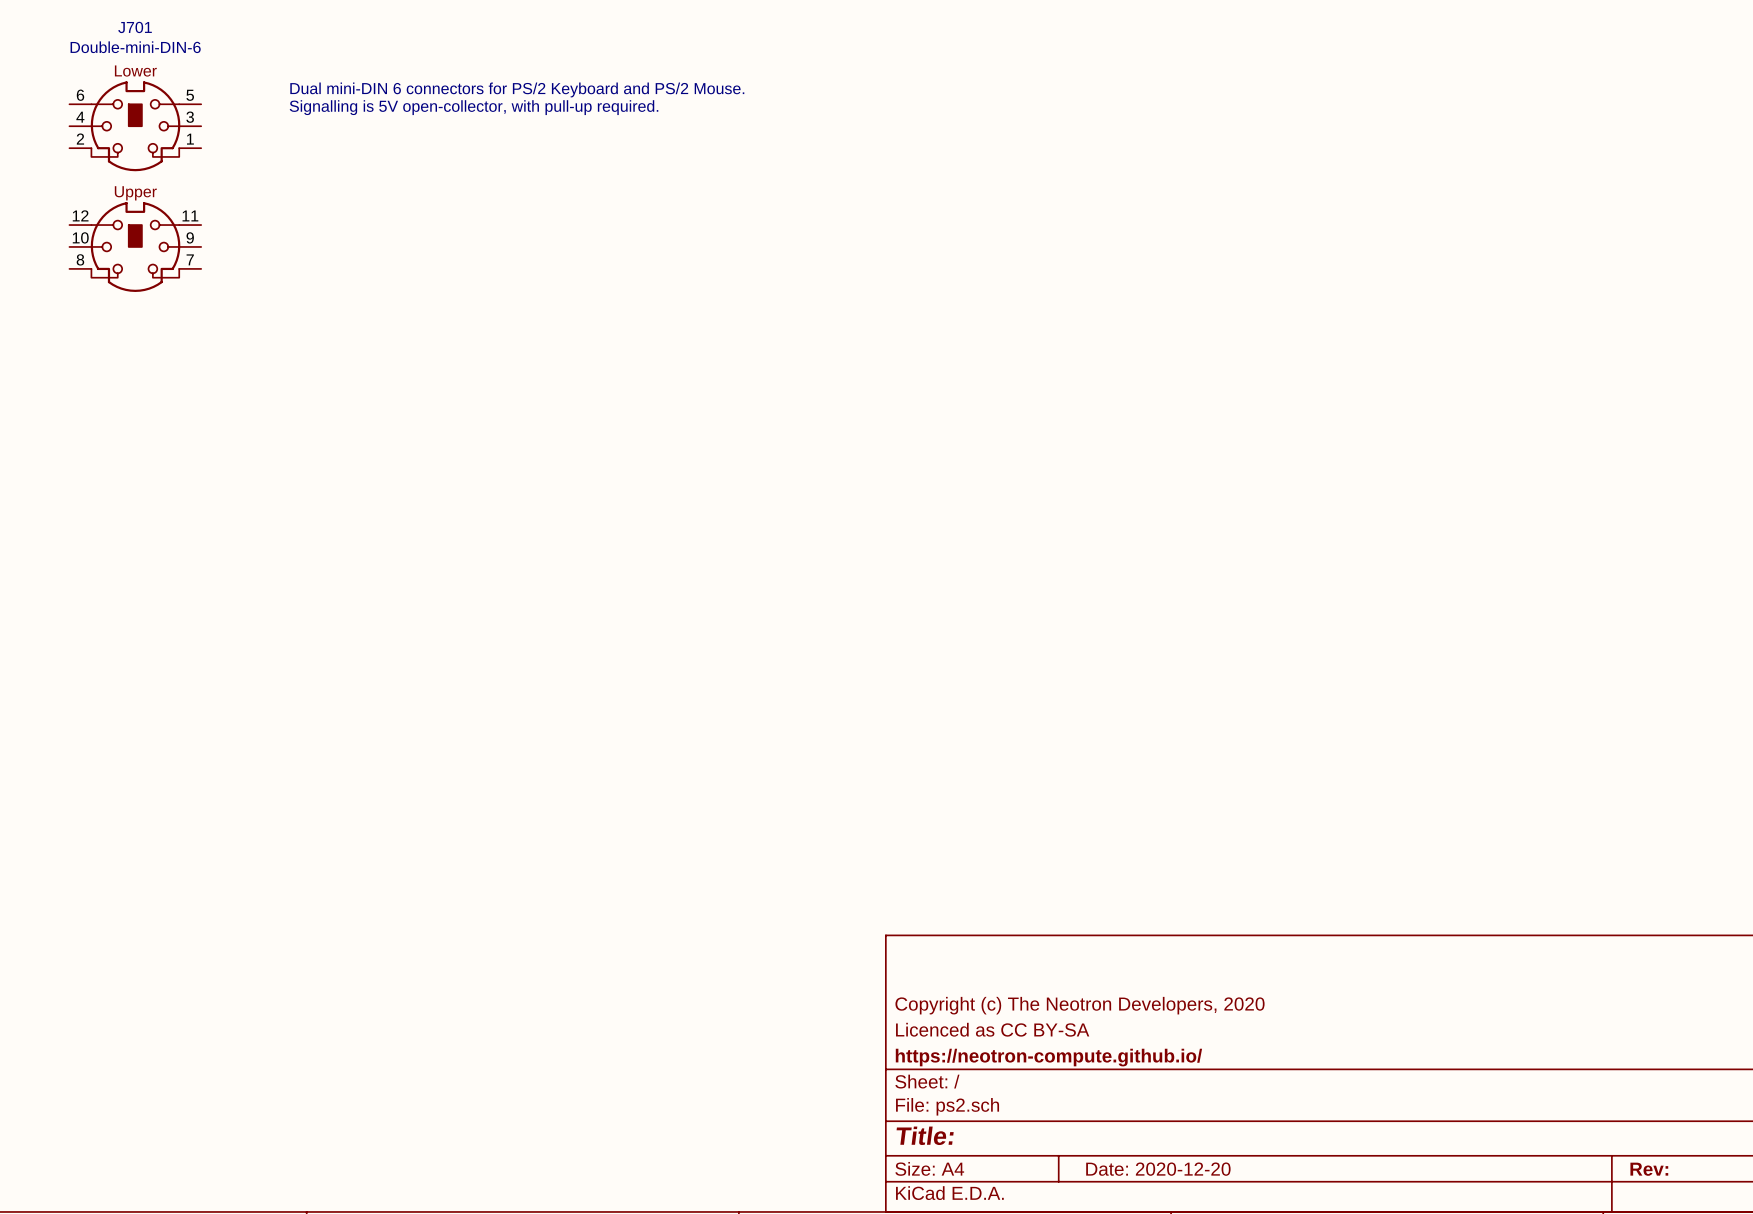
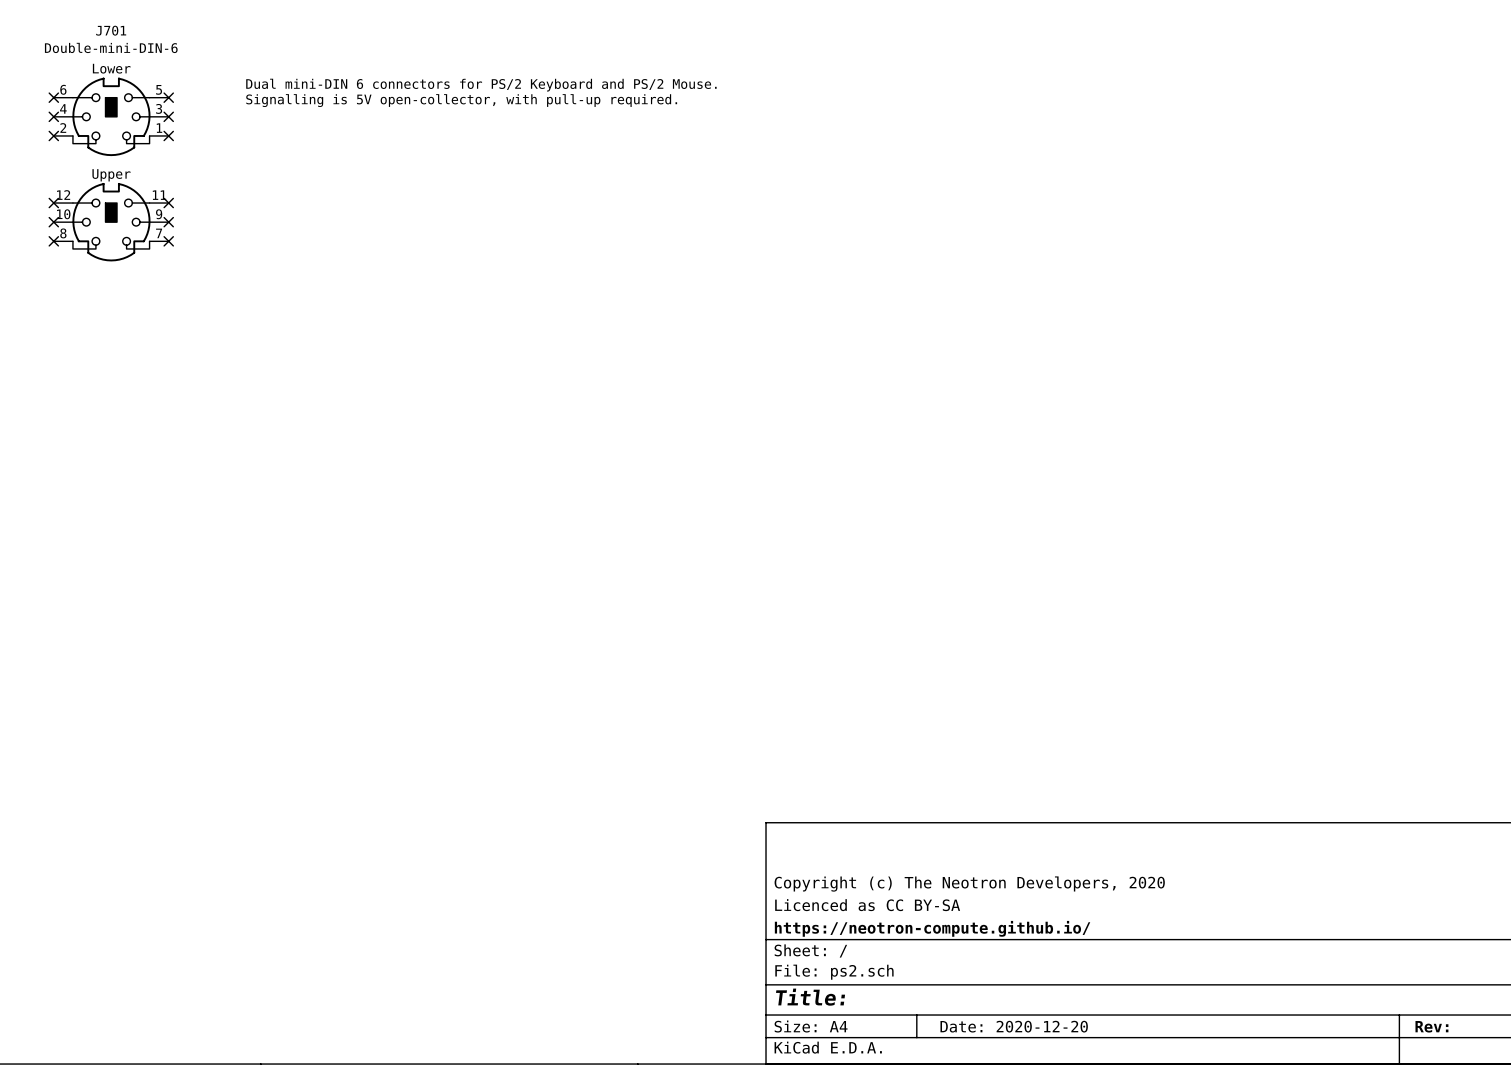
no-connect mark: none -> (53, 97)
no-connect mark: none -> (168, 97)
no-connect mark: none -> (53, 116)
no-connect mark: none -> (168, 116)
no-connect mark: none -> (53, 135)
no-connect mark: none -> (168, 135)
no-connect mark: none -> (53, 203)
no-connect mark: none -> (168, 203)
no-connect mark: none -> (53, 222)
no-connect mark: none -> (168, 222)
no-connect mark: none -> (53, 241)
no-connect mark: none -> (168, 241)

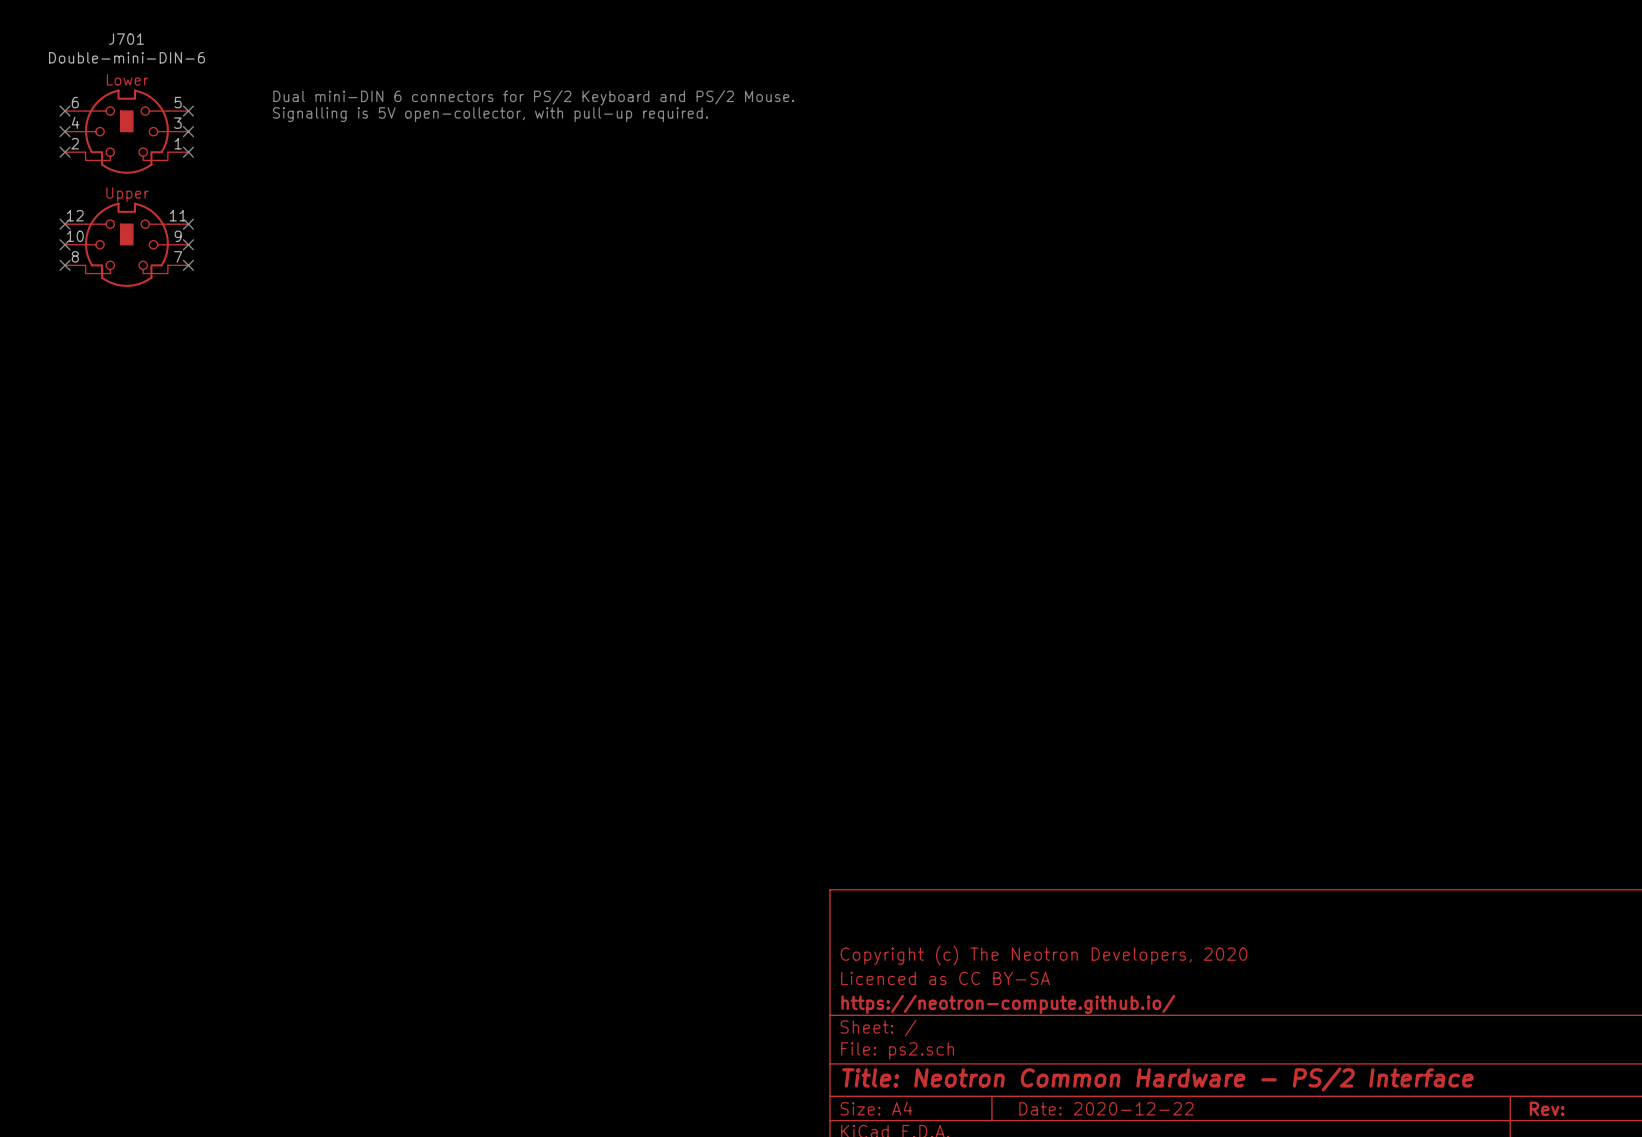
title block: Title: (810, 997) -> Title: Neotron Common Hardware - PS/2 Interface (1157, 1079)
title block: Date: 2020-12-20 (1014, 1026) -> Date: 2020-12-22 (1106, 1108)

